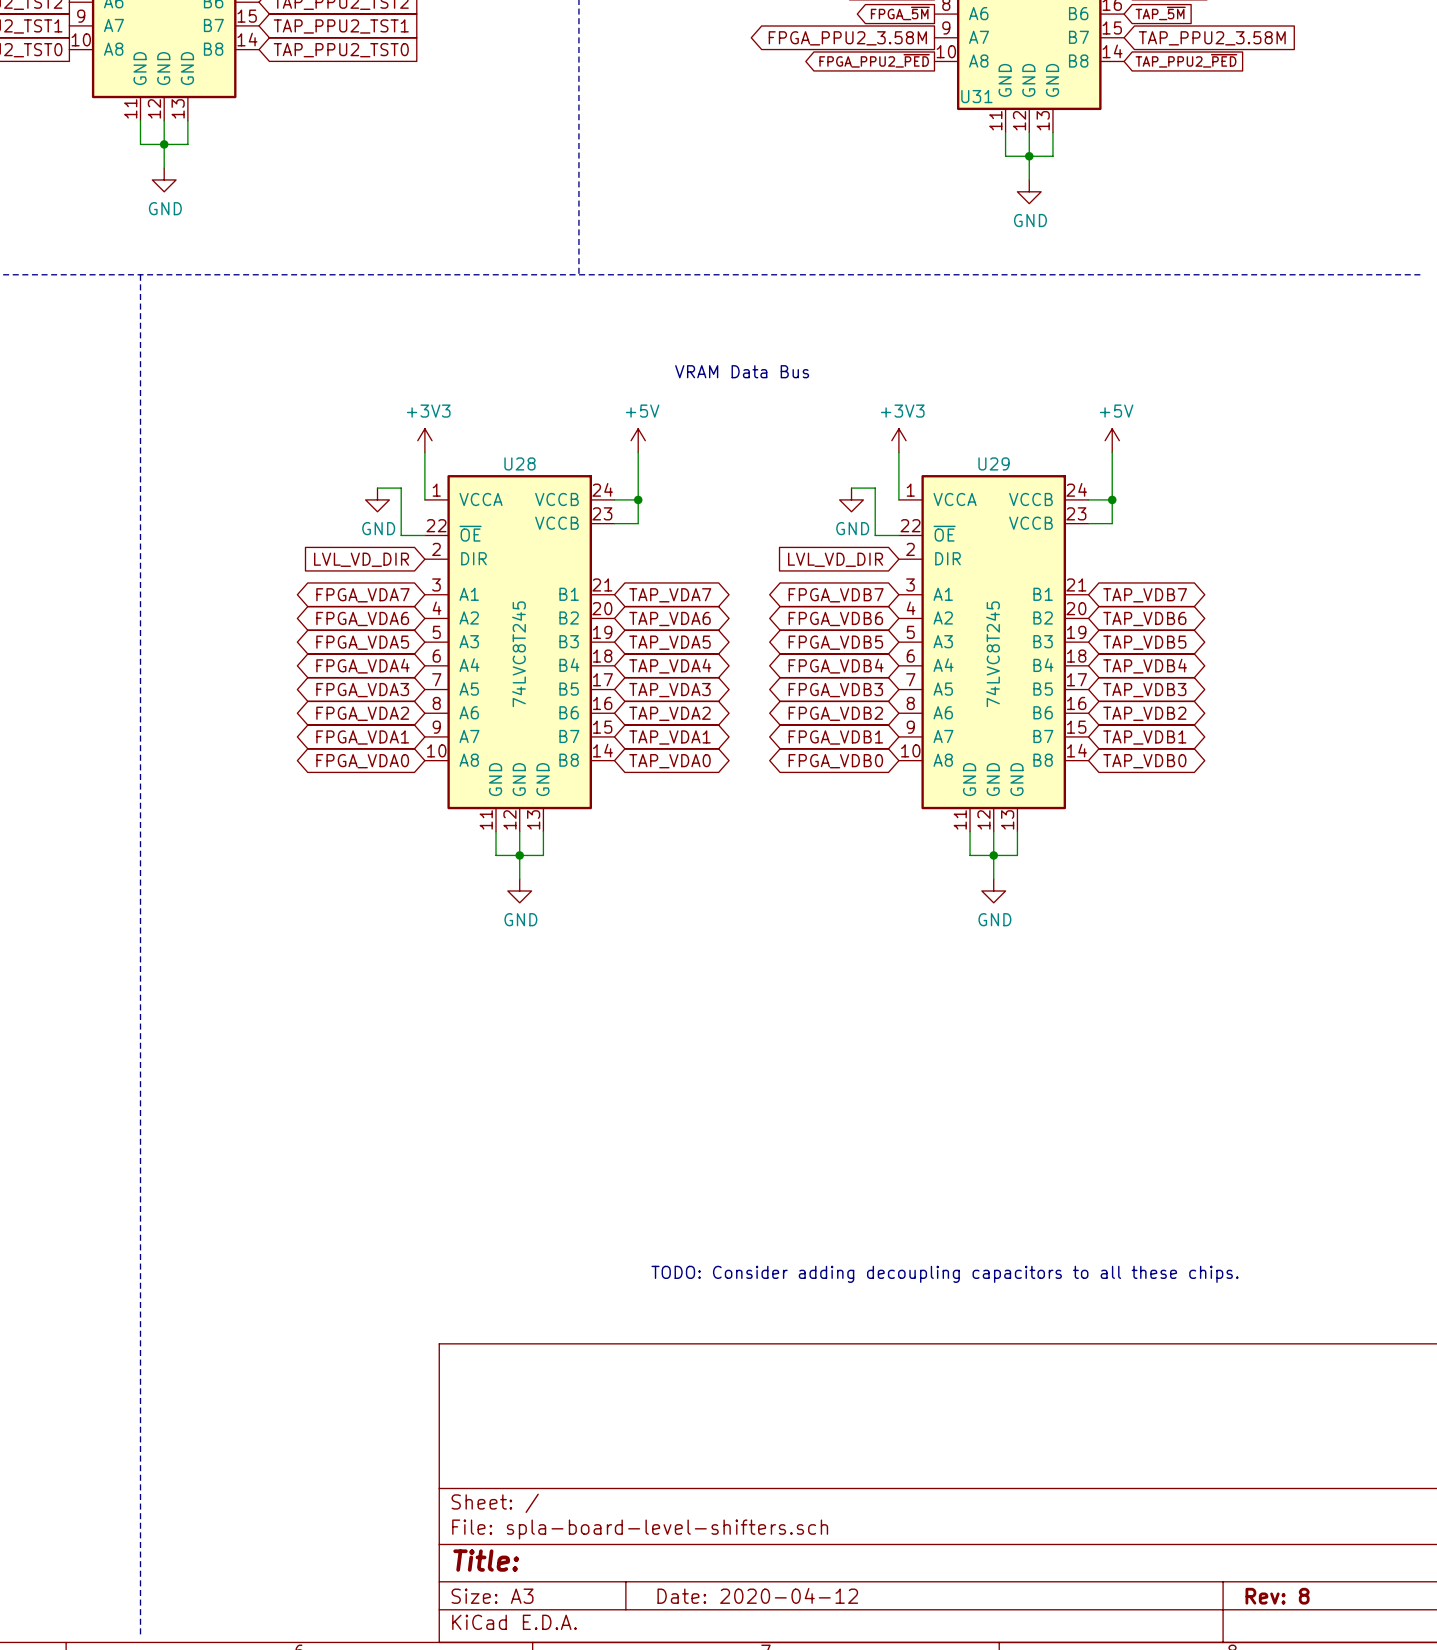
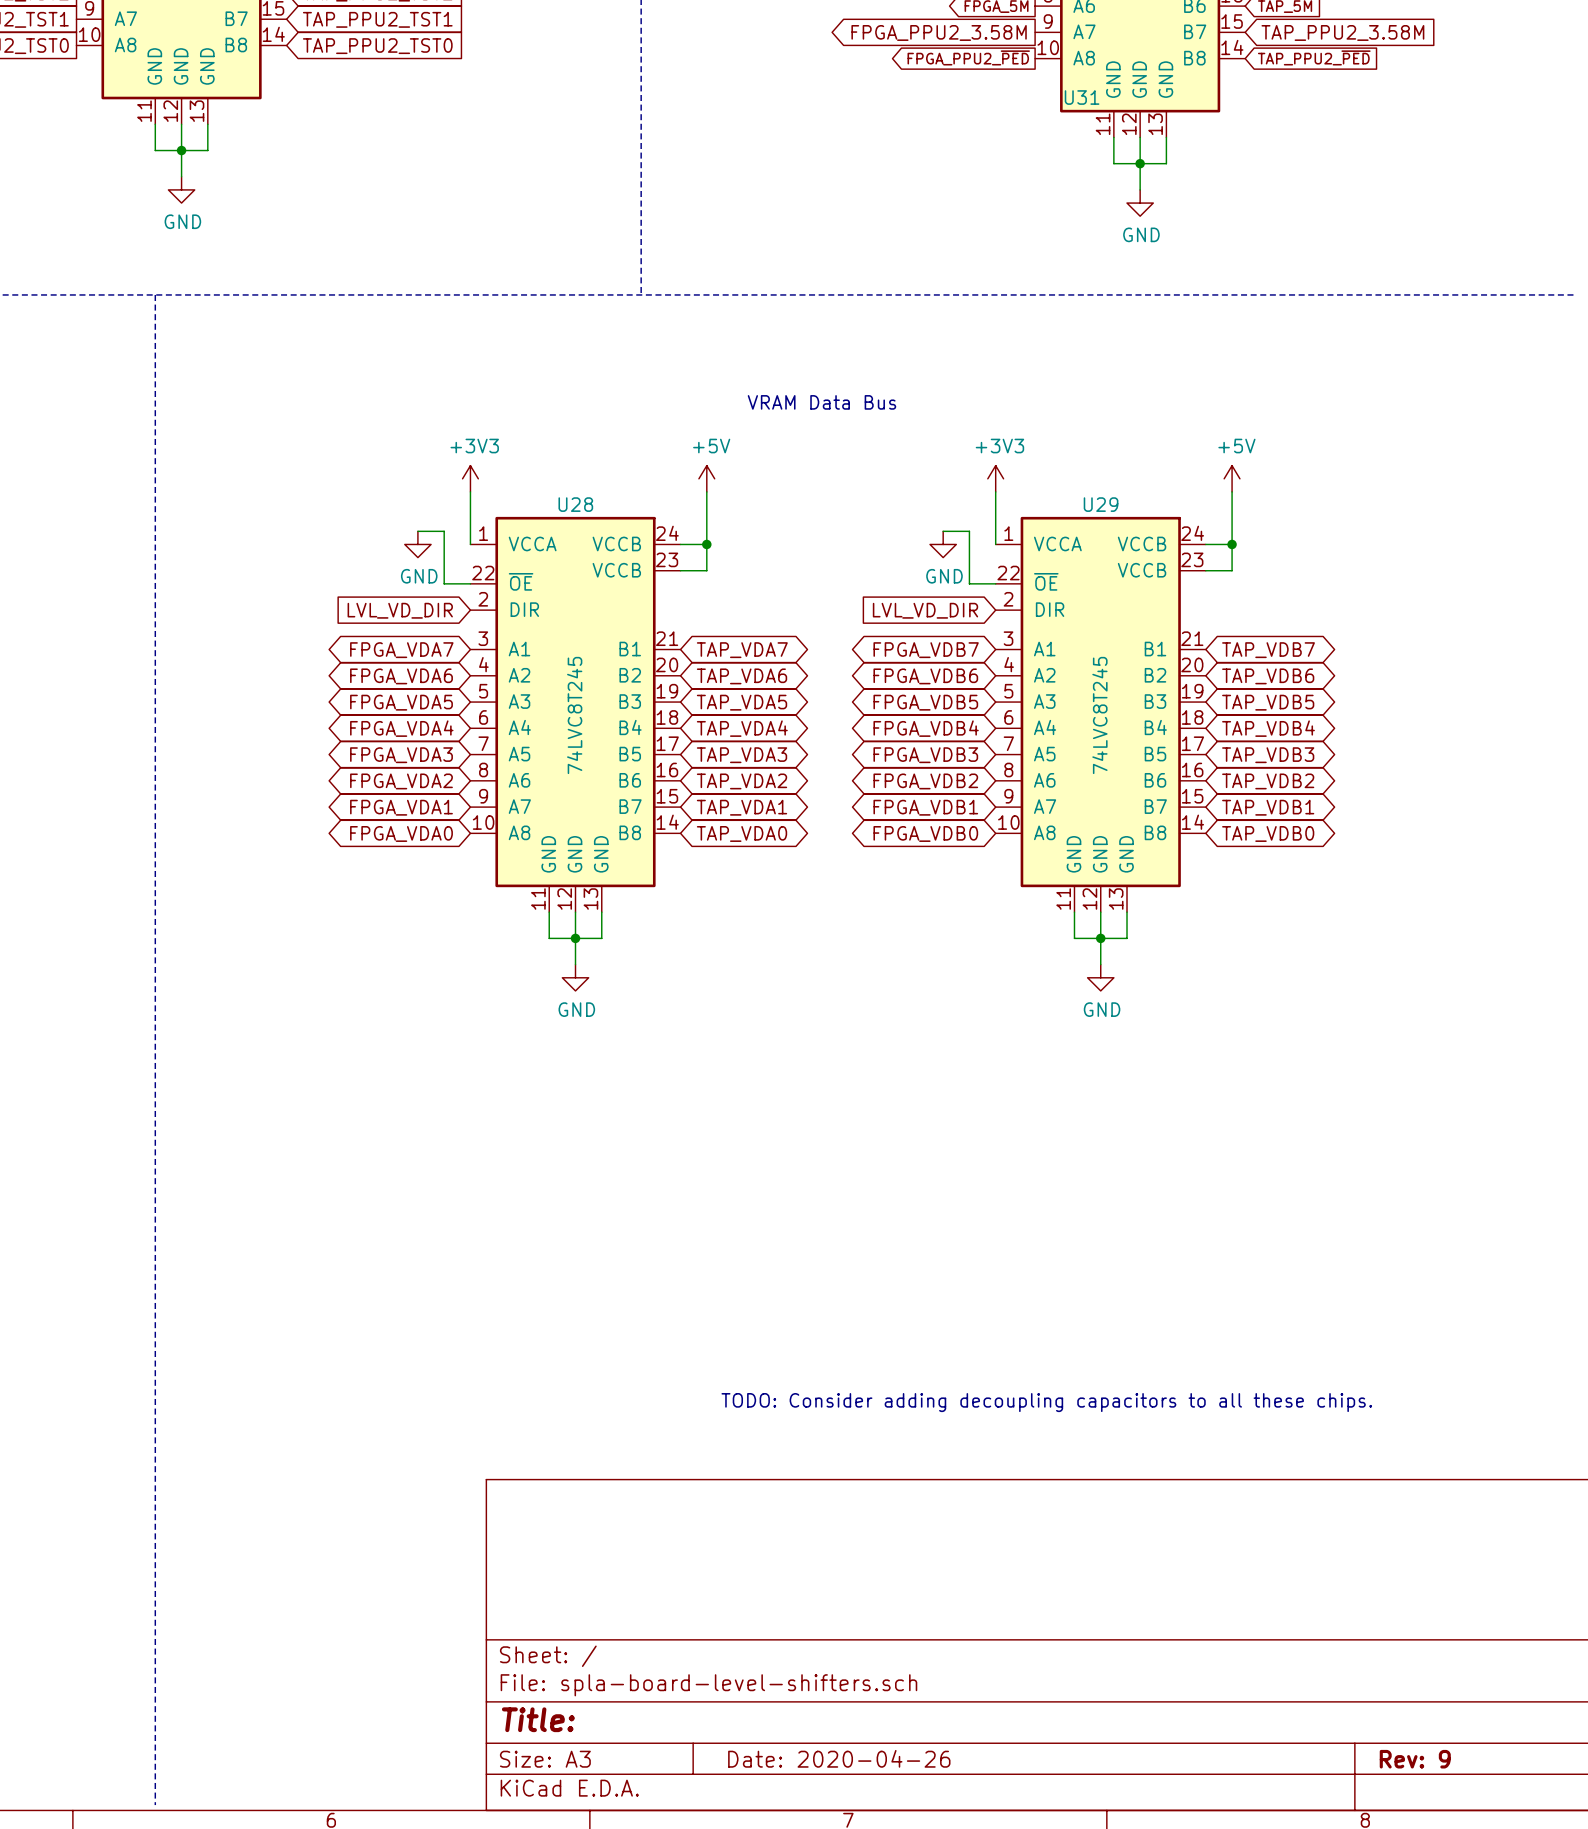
title block: Date: 2020-04-12 (757, 1595) -> Date: 2020-04-26 (839, 1758)
title block: Rev: 8 (1277, 1596) -> Rev: 9 (1415, 1759)

